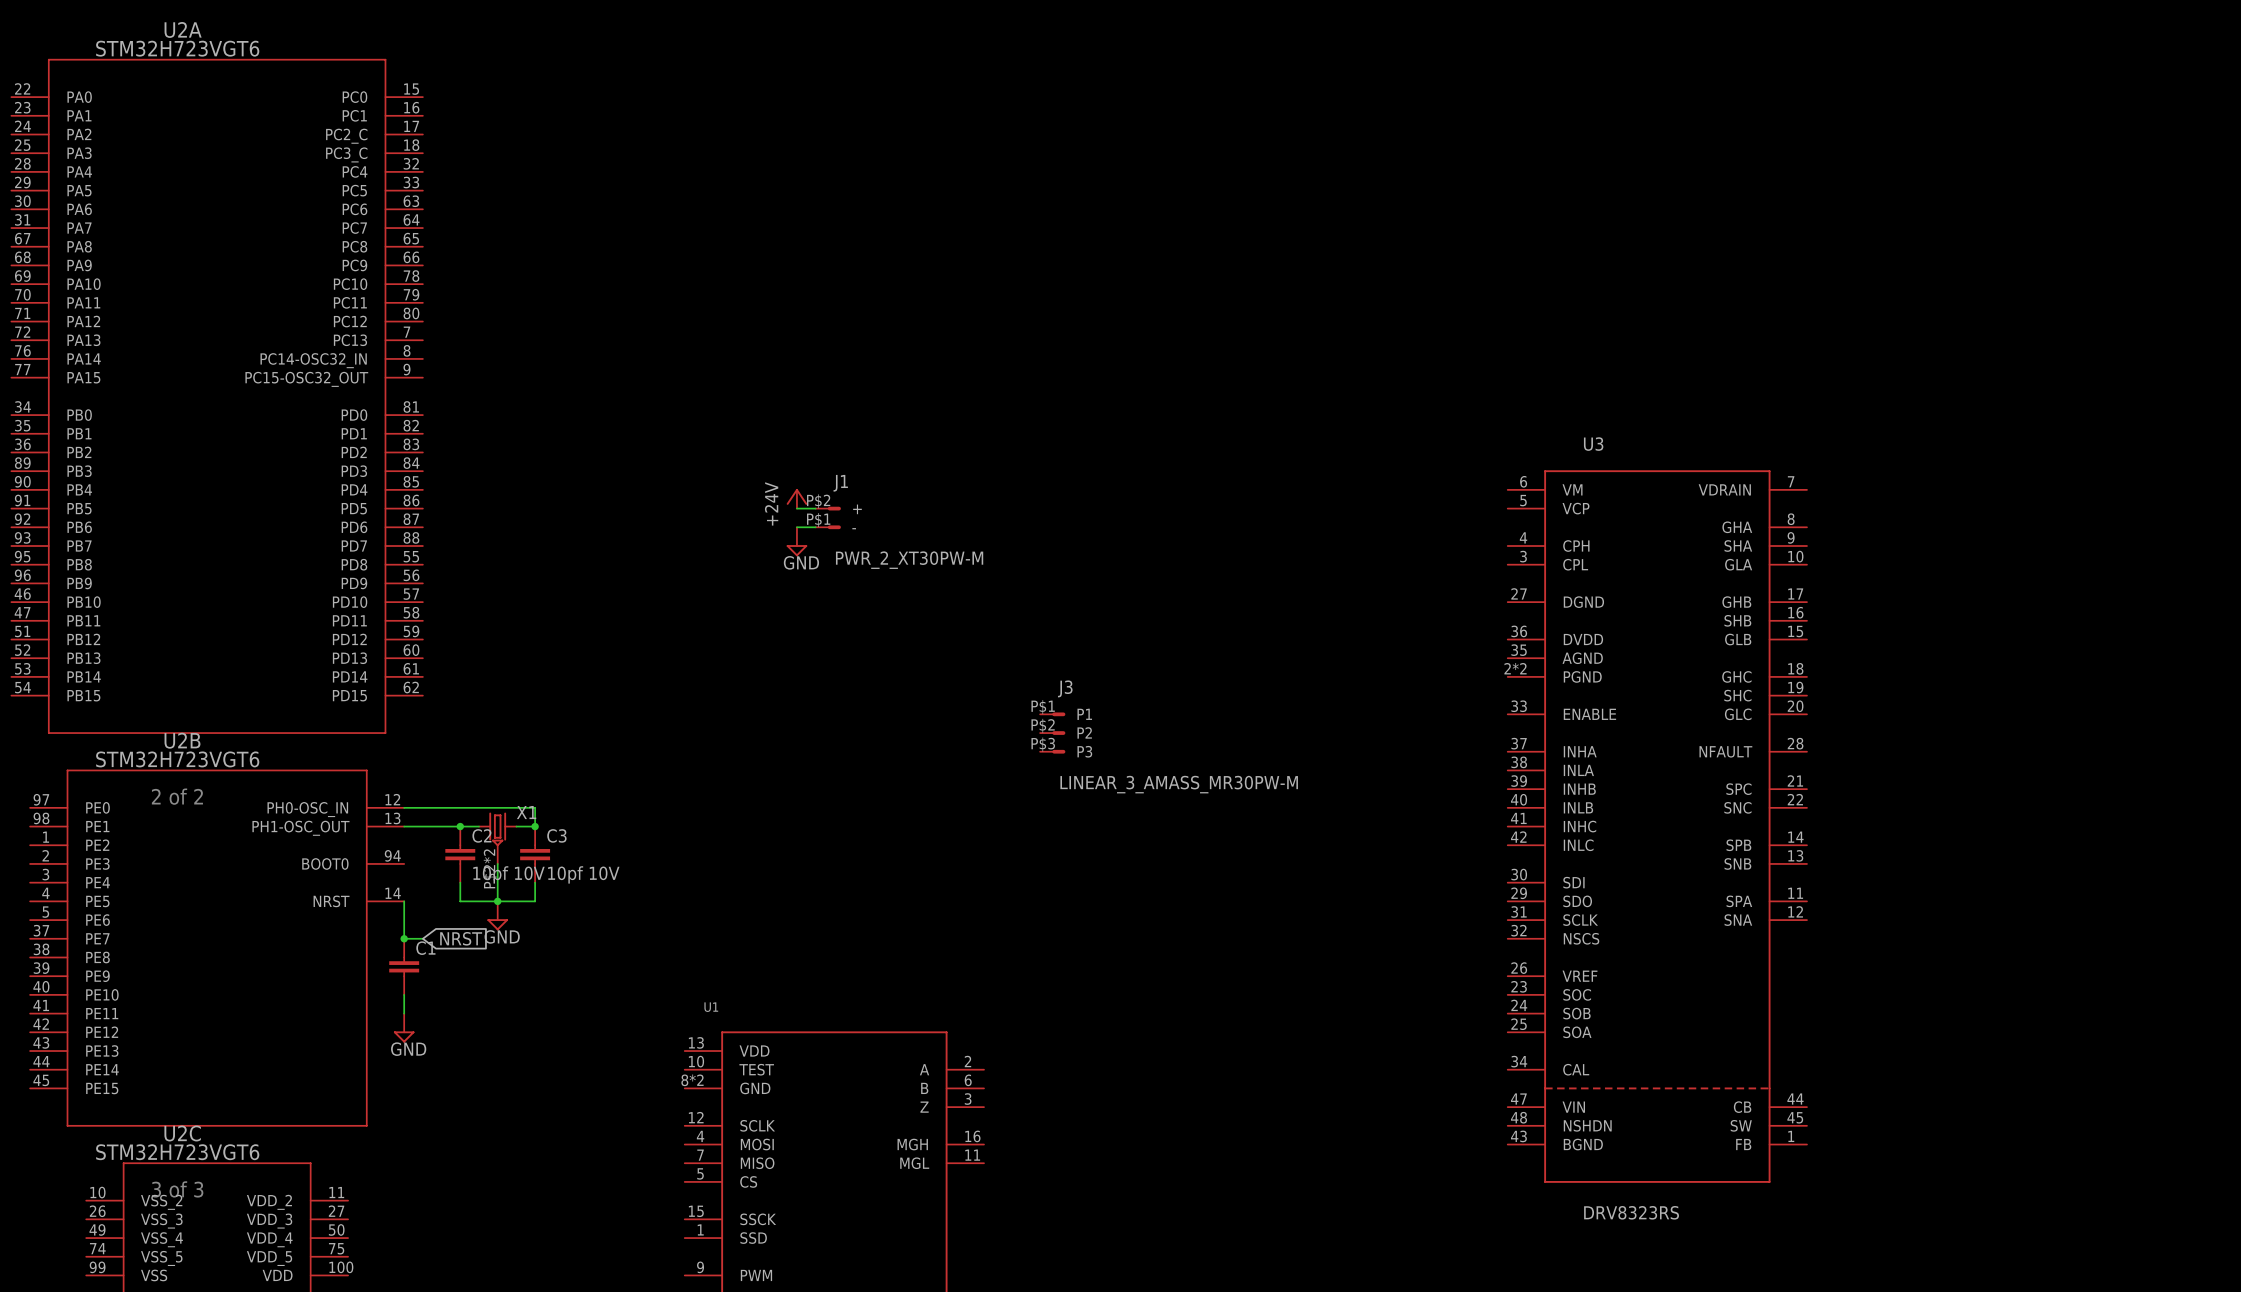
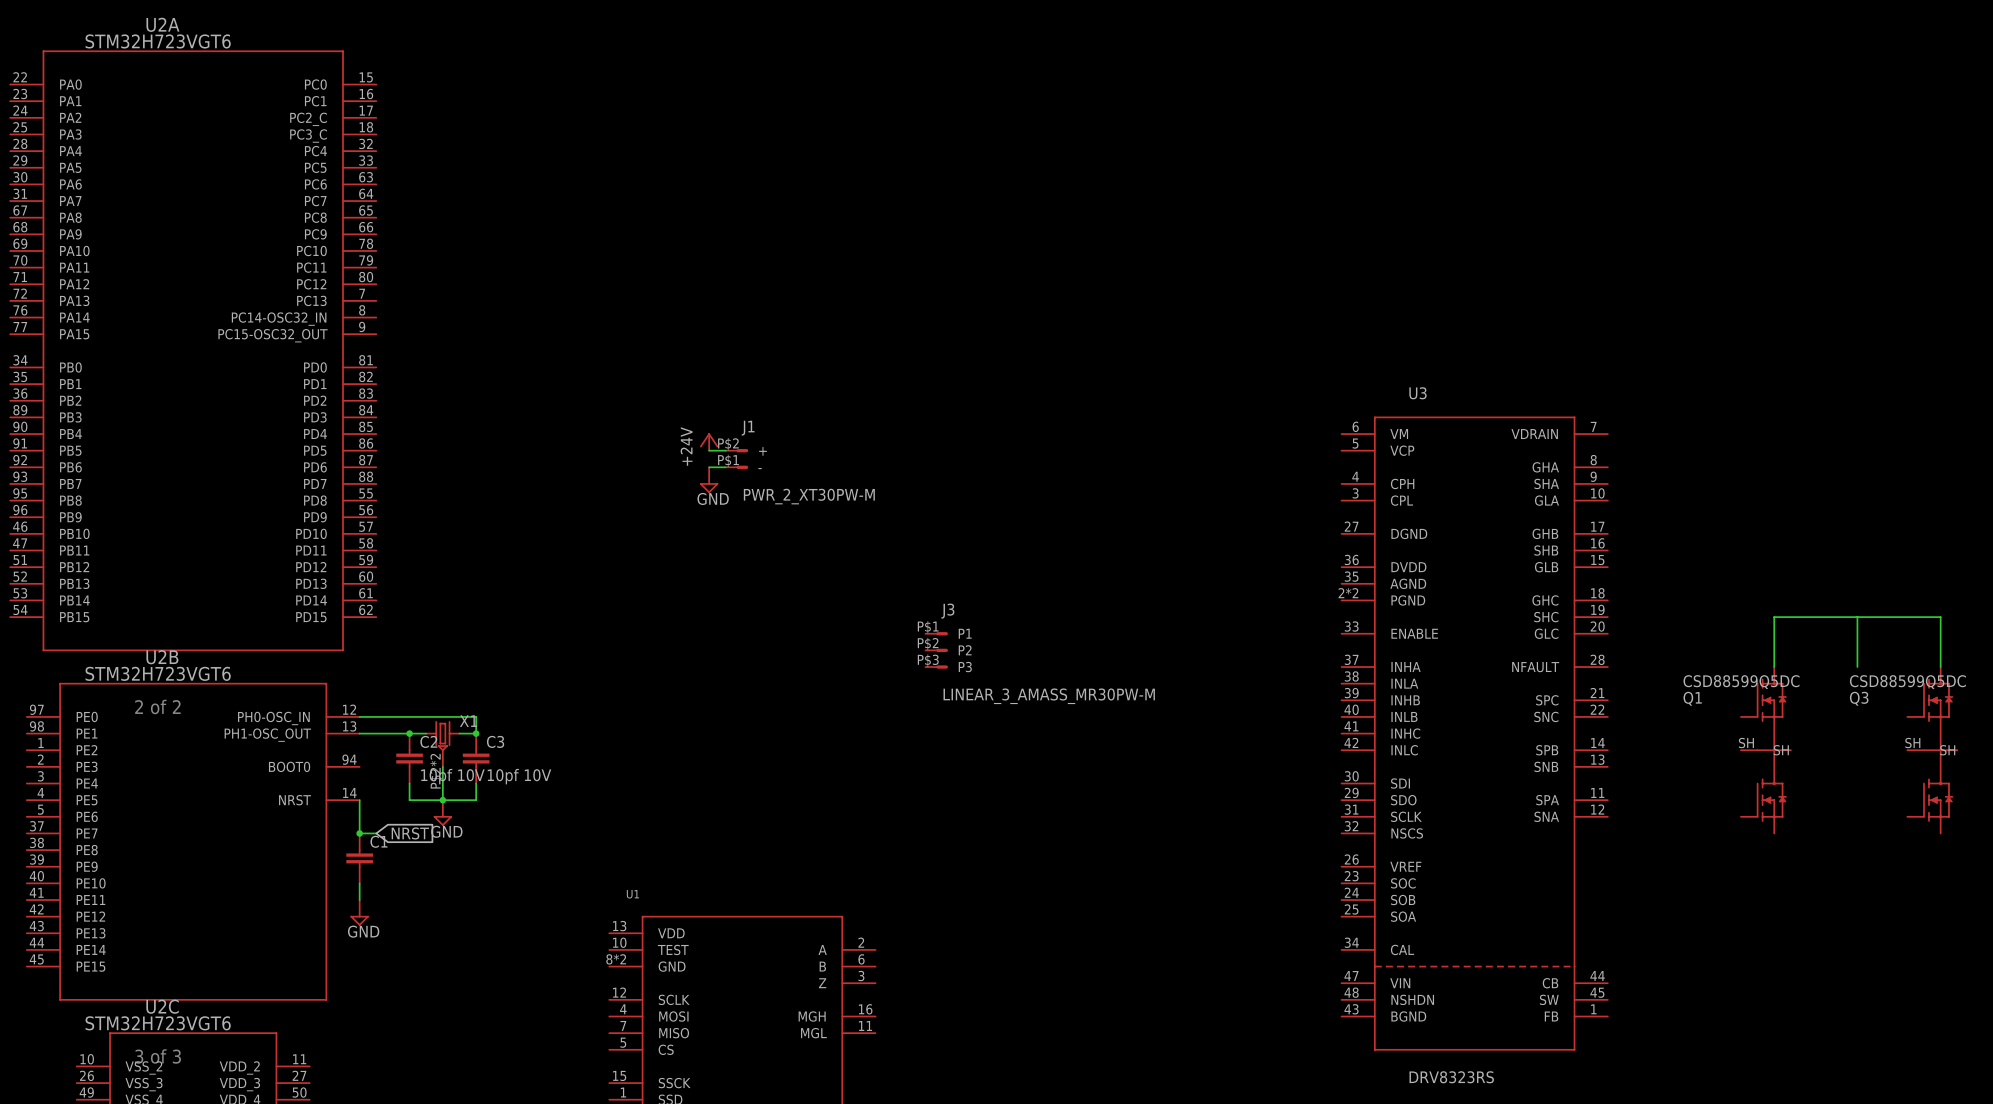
wire: none -> (1857, 617) (1857, 667)
wire: none -> (1774, 667) (1774, 617) (1940, 617) (1940, 667)
Q1: none -> CSD88599Q5DC (1765, 750)
Q3: none -> CSD88599Q5DC (1932, 750)

